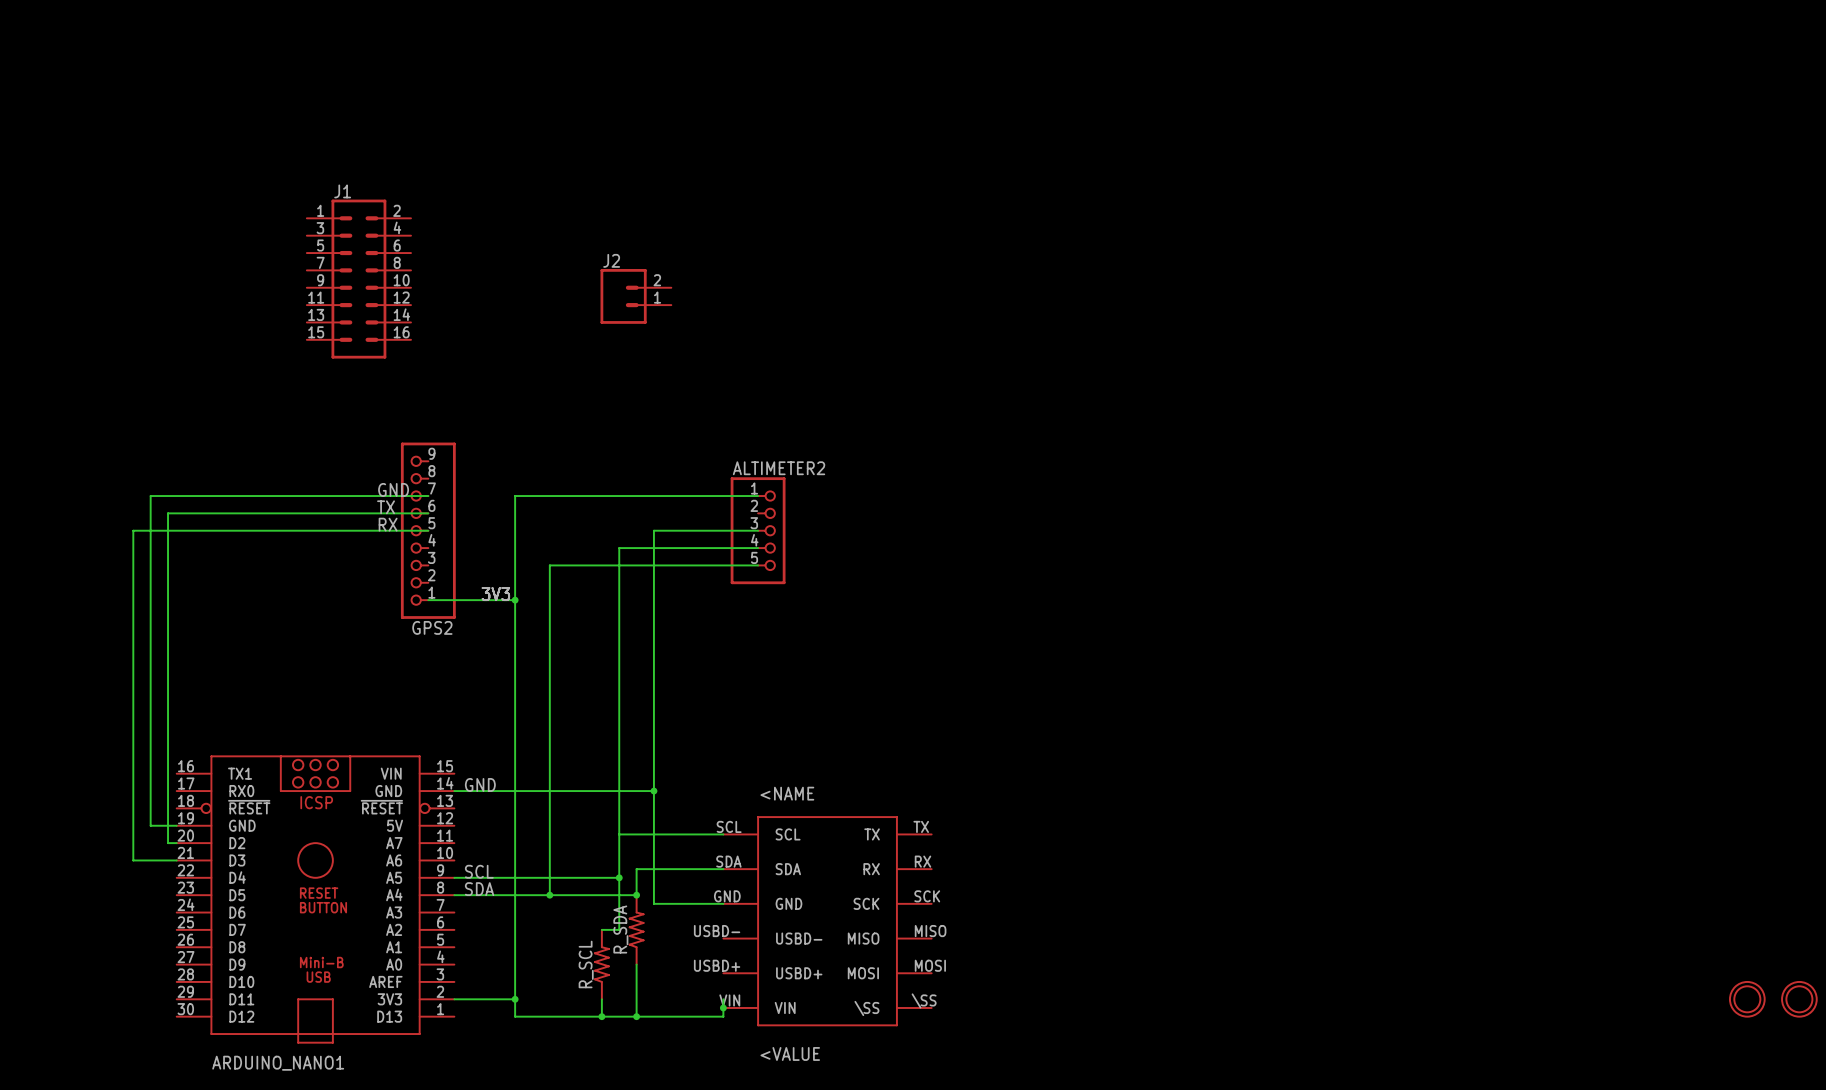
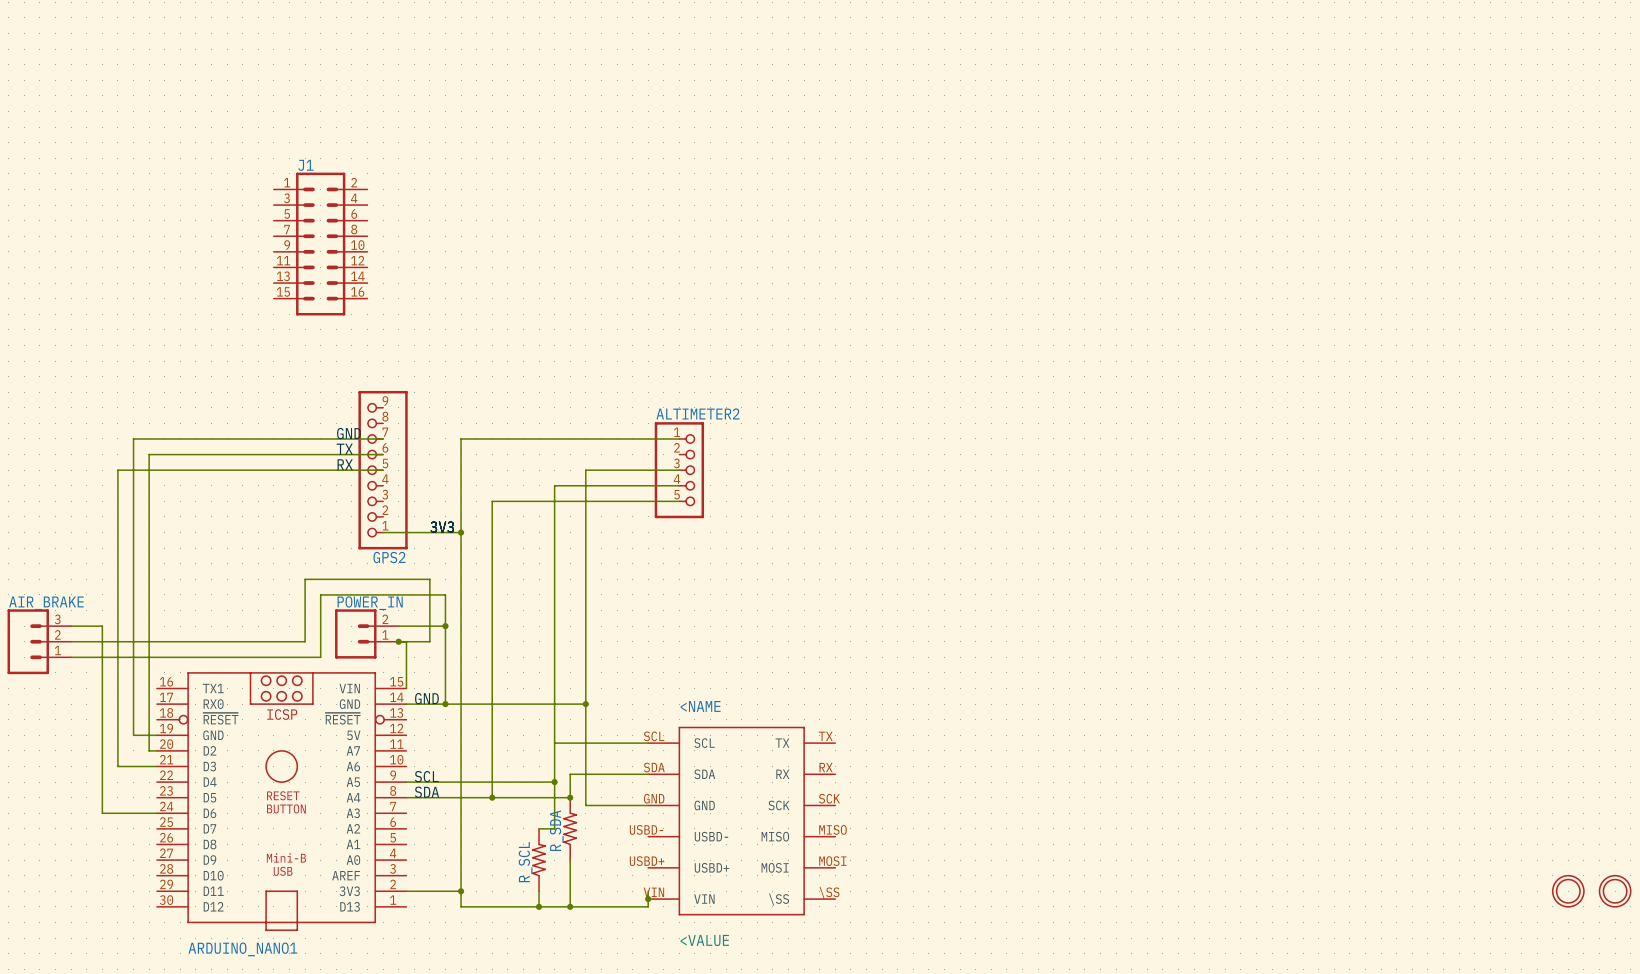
J2: (635, 296) -> none
wire: none -> (71, 626) (102, 626) (102, 813) (156, 813)
wire: none -> (398, 626) (445, 626)
junction: none -> (445, 626)
POWER_IN: none -> (366, 633)
AIR_BRAKE: none -> (39, 641)
wire: none -> (71, 641) (305, 641) (305, 579) (429, 579) (429, 641) (398, 641)
junction: none -> (398, 641)
wire: none -> (406, 641) (406, 688)
wire: none -> (71, 657) (320, 657) (320, 594) (445, 594) (445, 704)
junction: none -> (445, 704)

